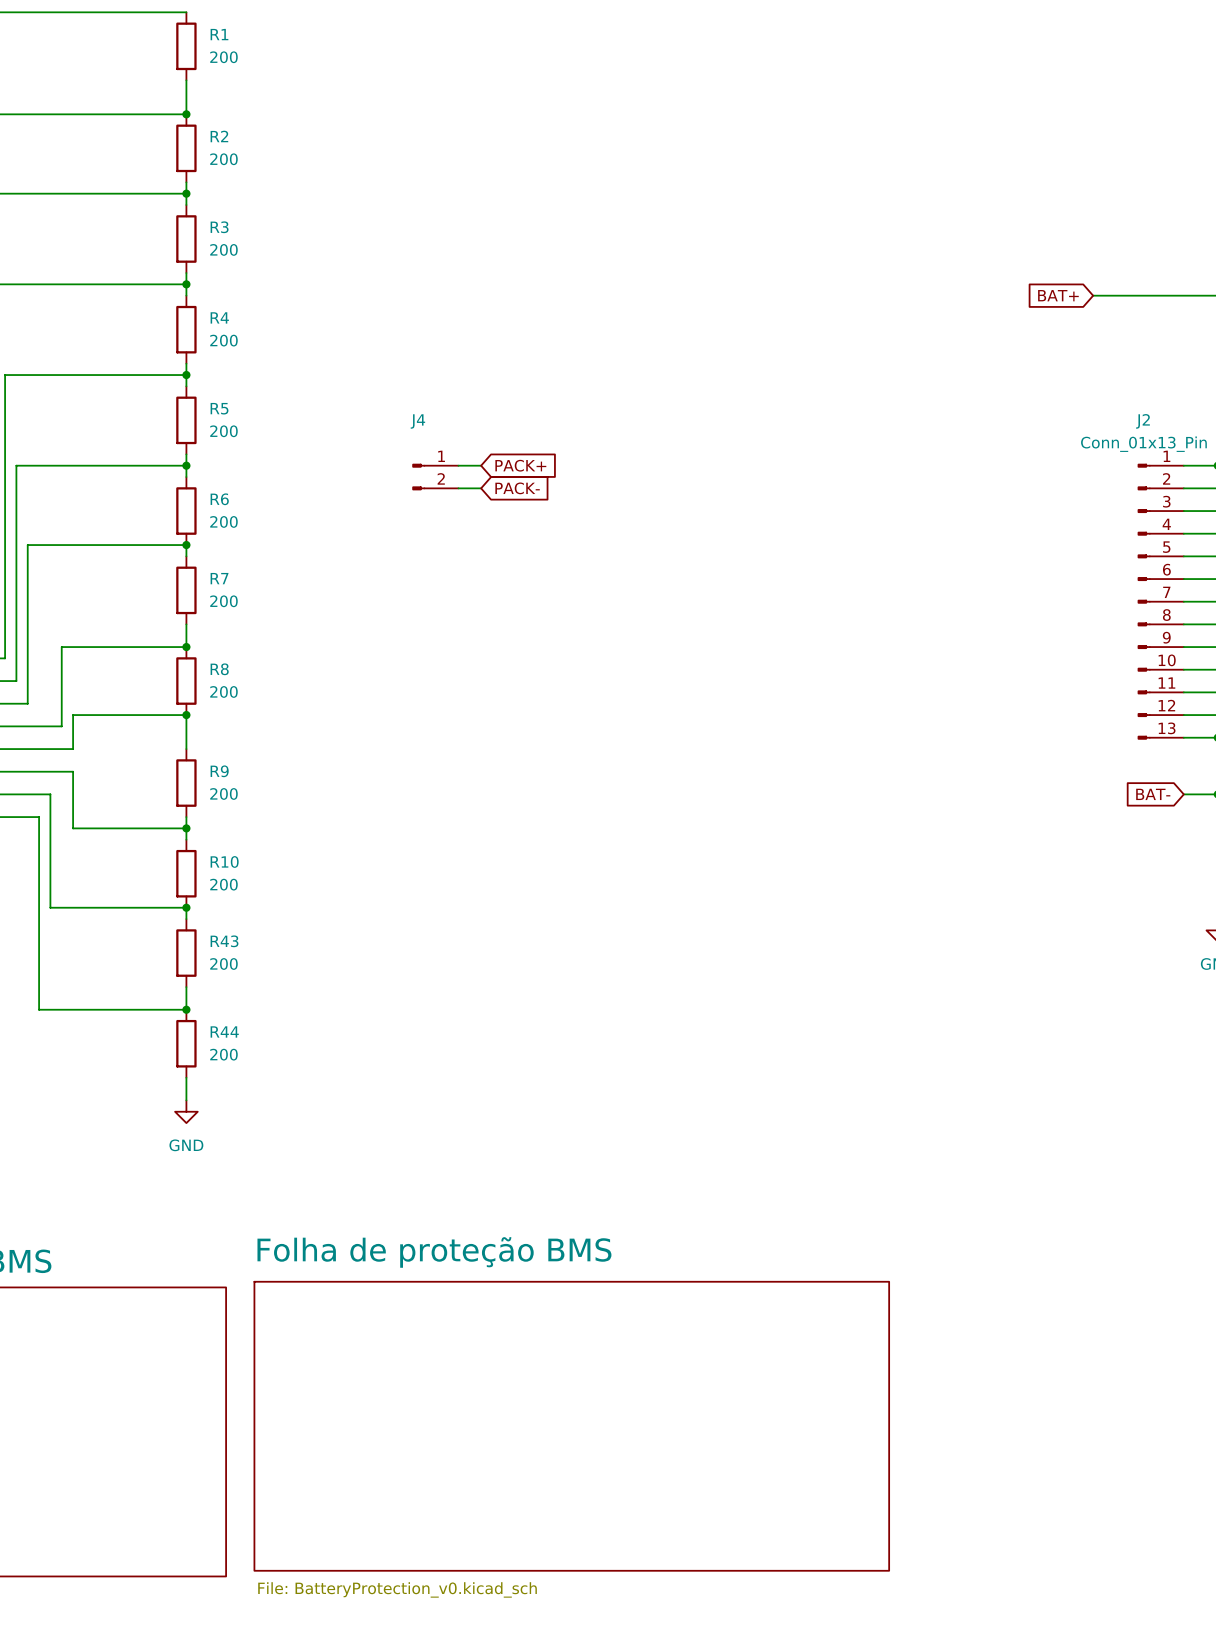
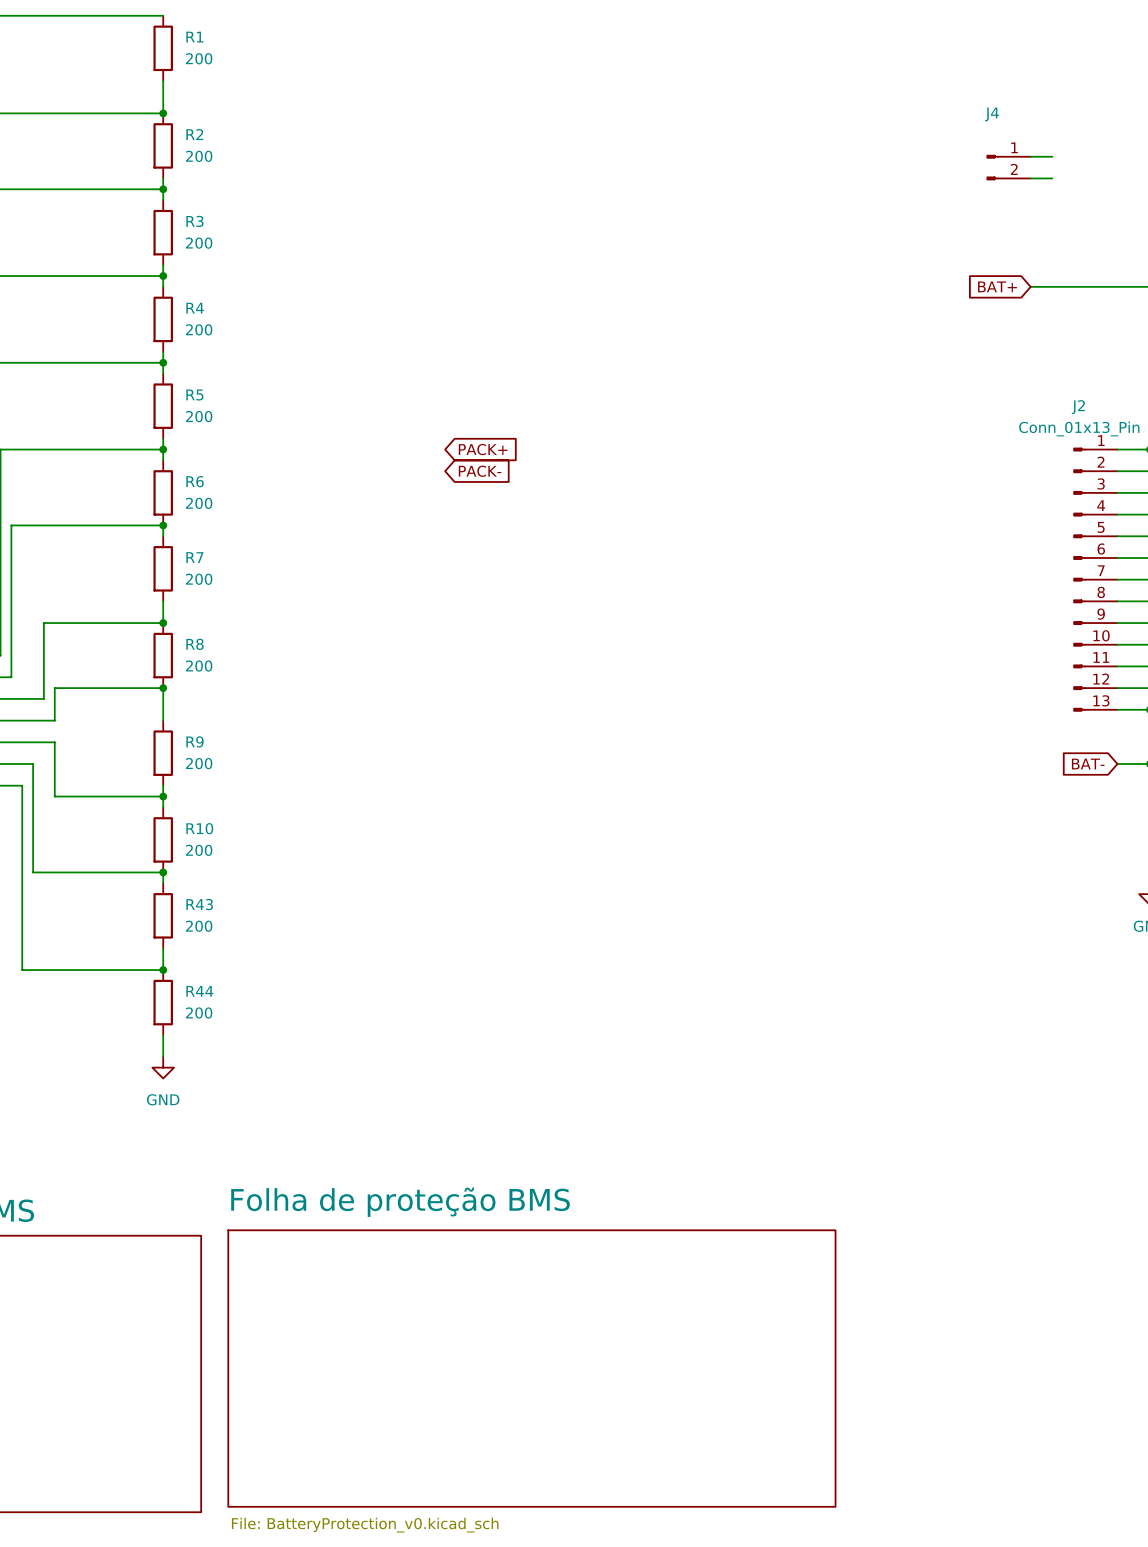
wire: none -> (1030, 156) (1052, 156)
wire: none -> (1030, 178) (1052, 178)
wire: (458, 465) (481, 465) -> none
J4 position: (435, 477) -> (1008, 167)
wire: (458, 488) (481, 488) -> none

